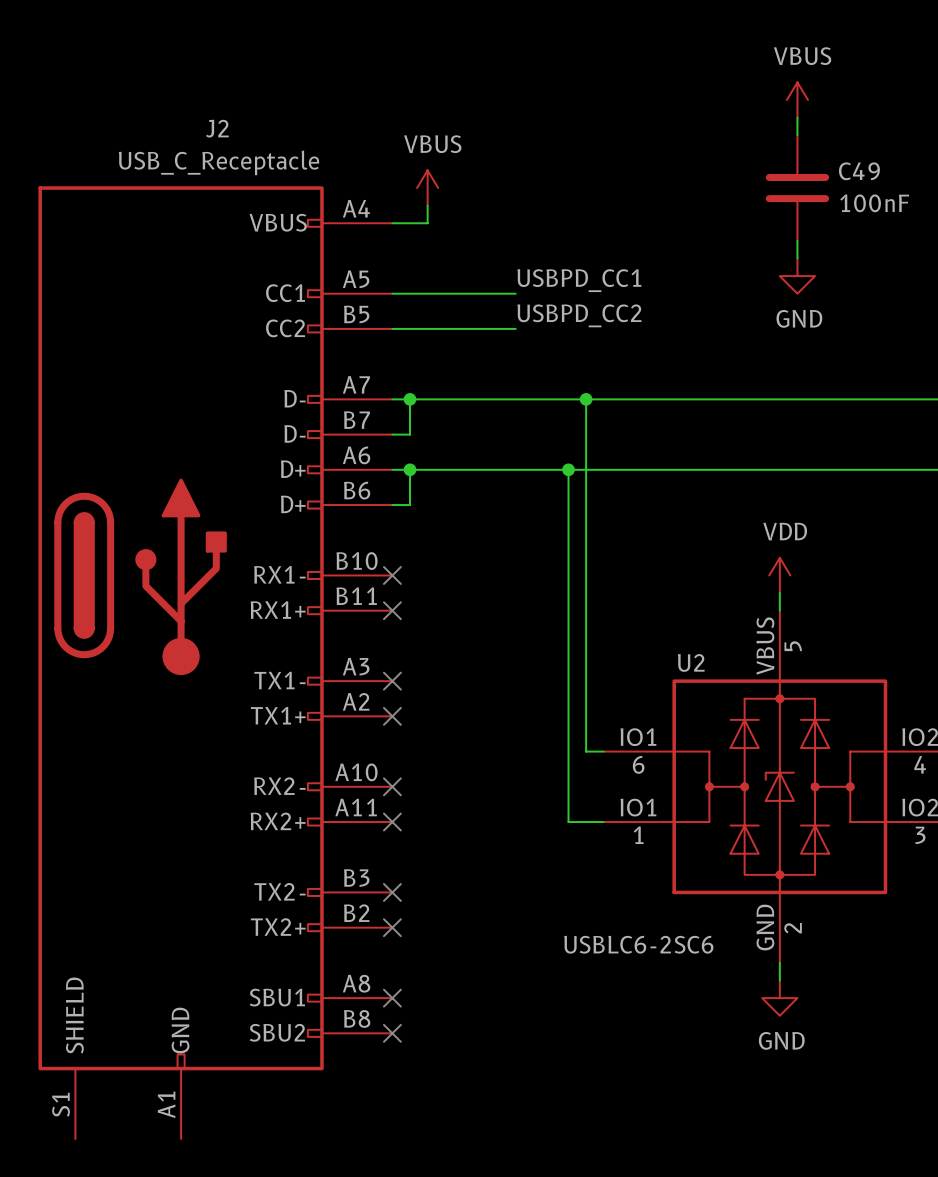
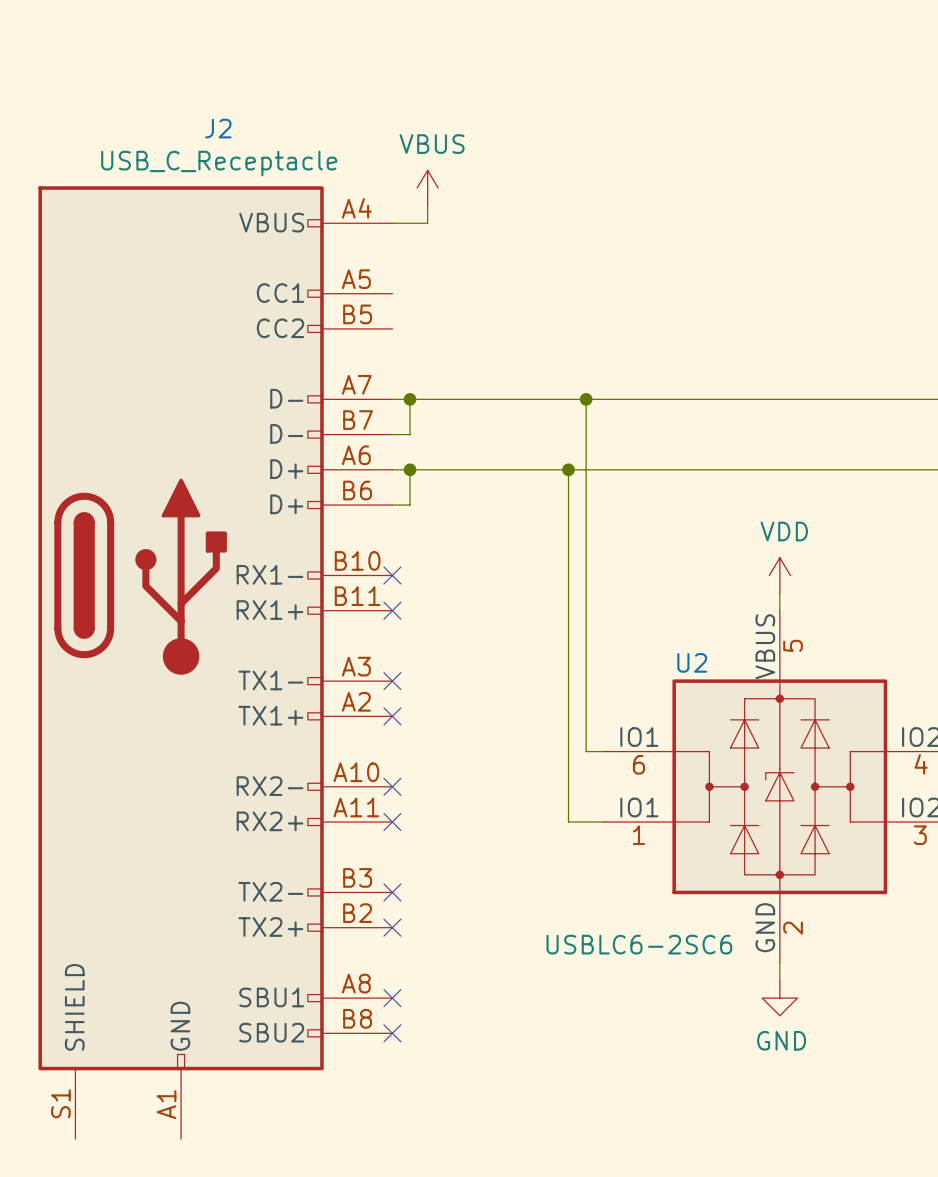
power symbol: VBUS (797, 99) -> none
wire: (797, 117) (797, 135) -> none
C49: 100nF (797, 188) -> none
wire: (797, 240) (797, 258) -> none
power symbol: GND (797, 276) -> none
label: USBPD_CC1 (579, 280) -> none
wire: (392, 293) (515, 293) -> none
label: USBPD_CC2 (579, 315) -> none
wire: (392, 328) (515, 328) -> none

